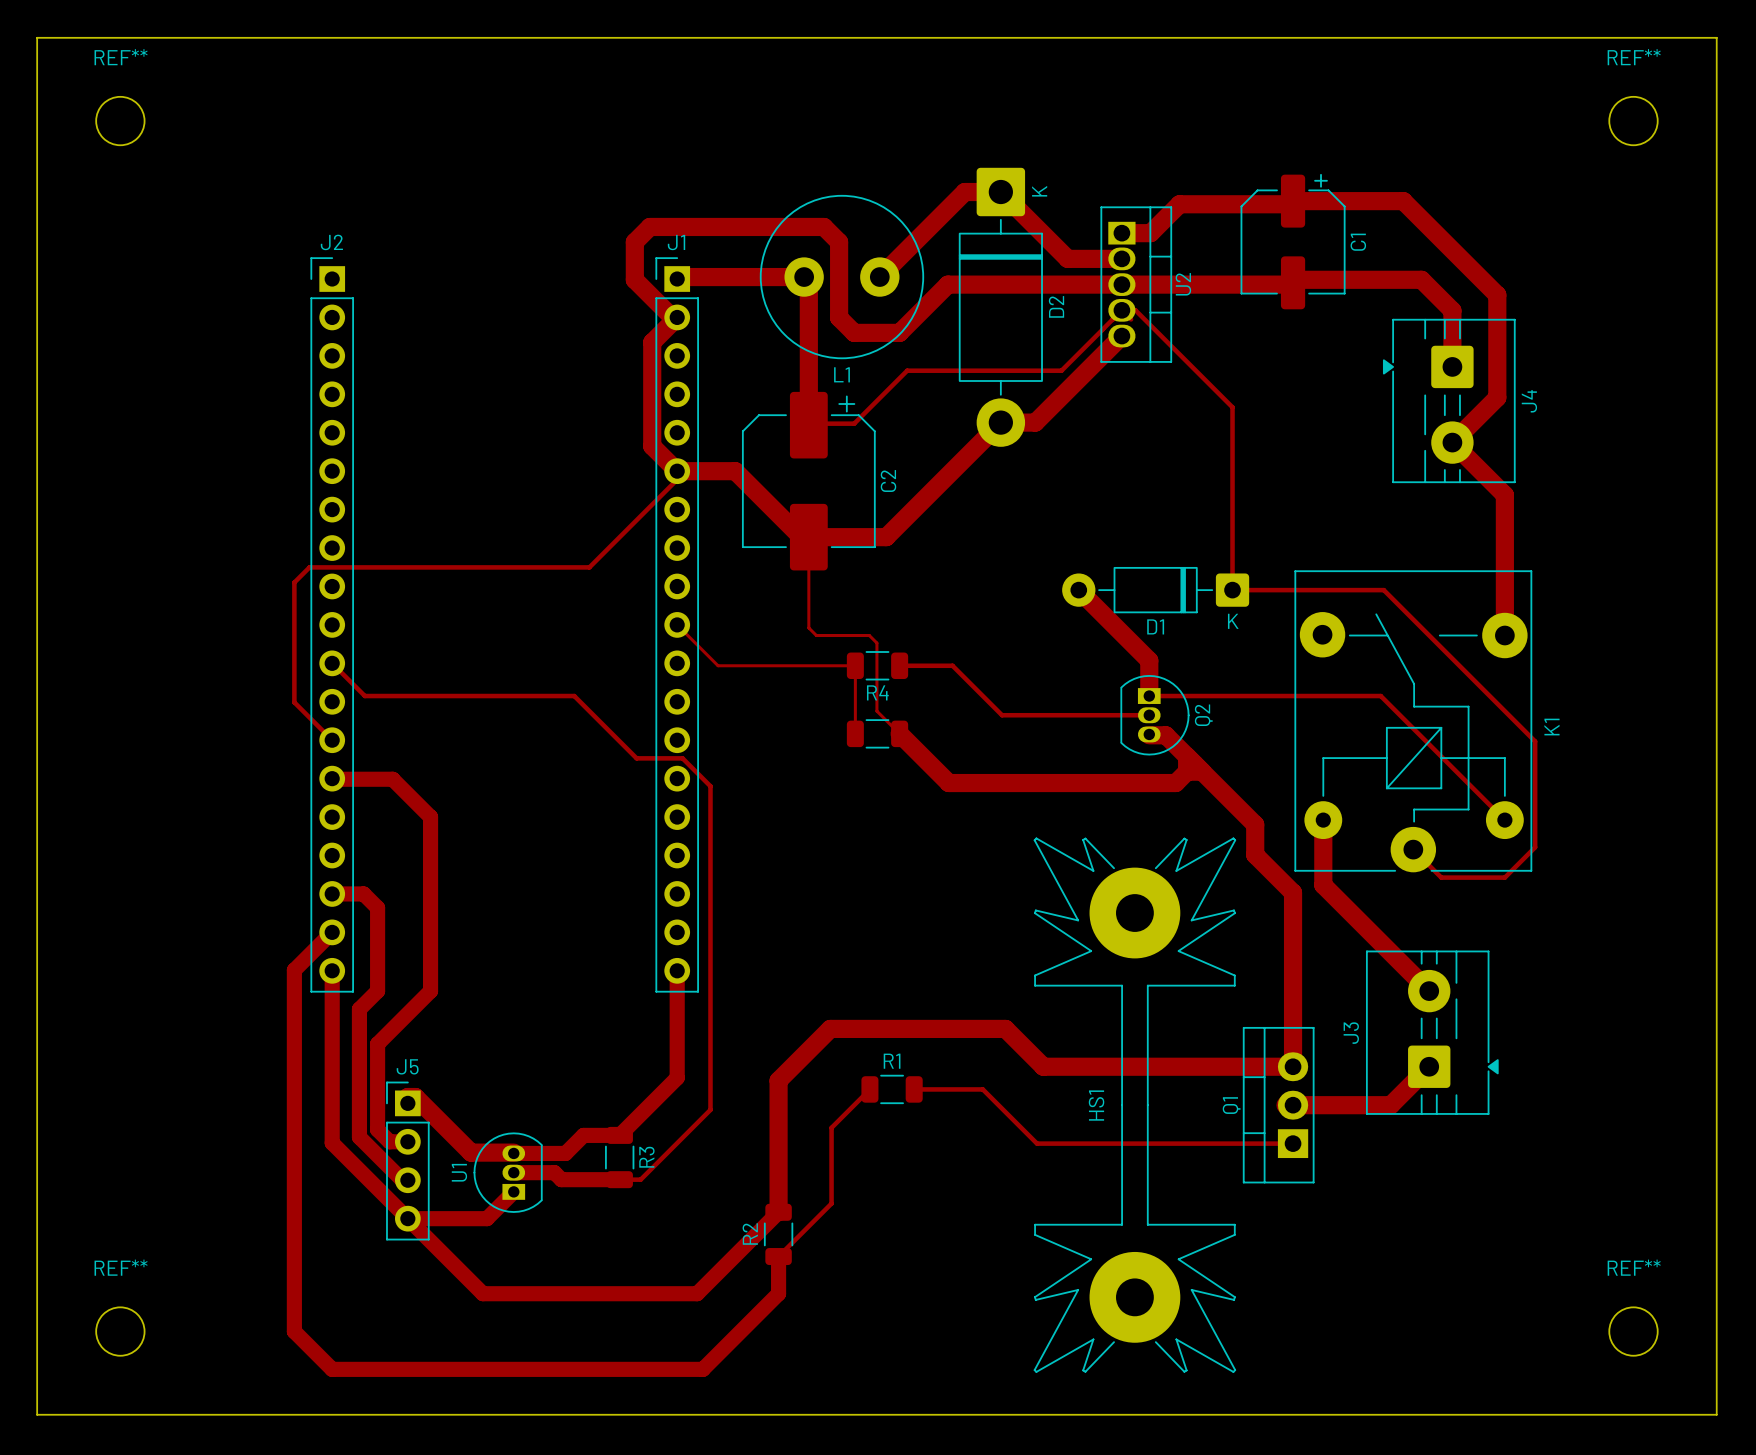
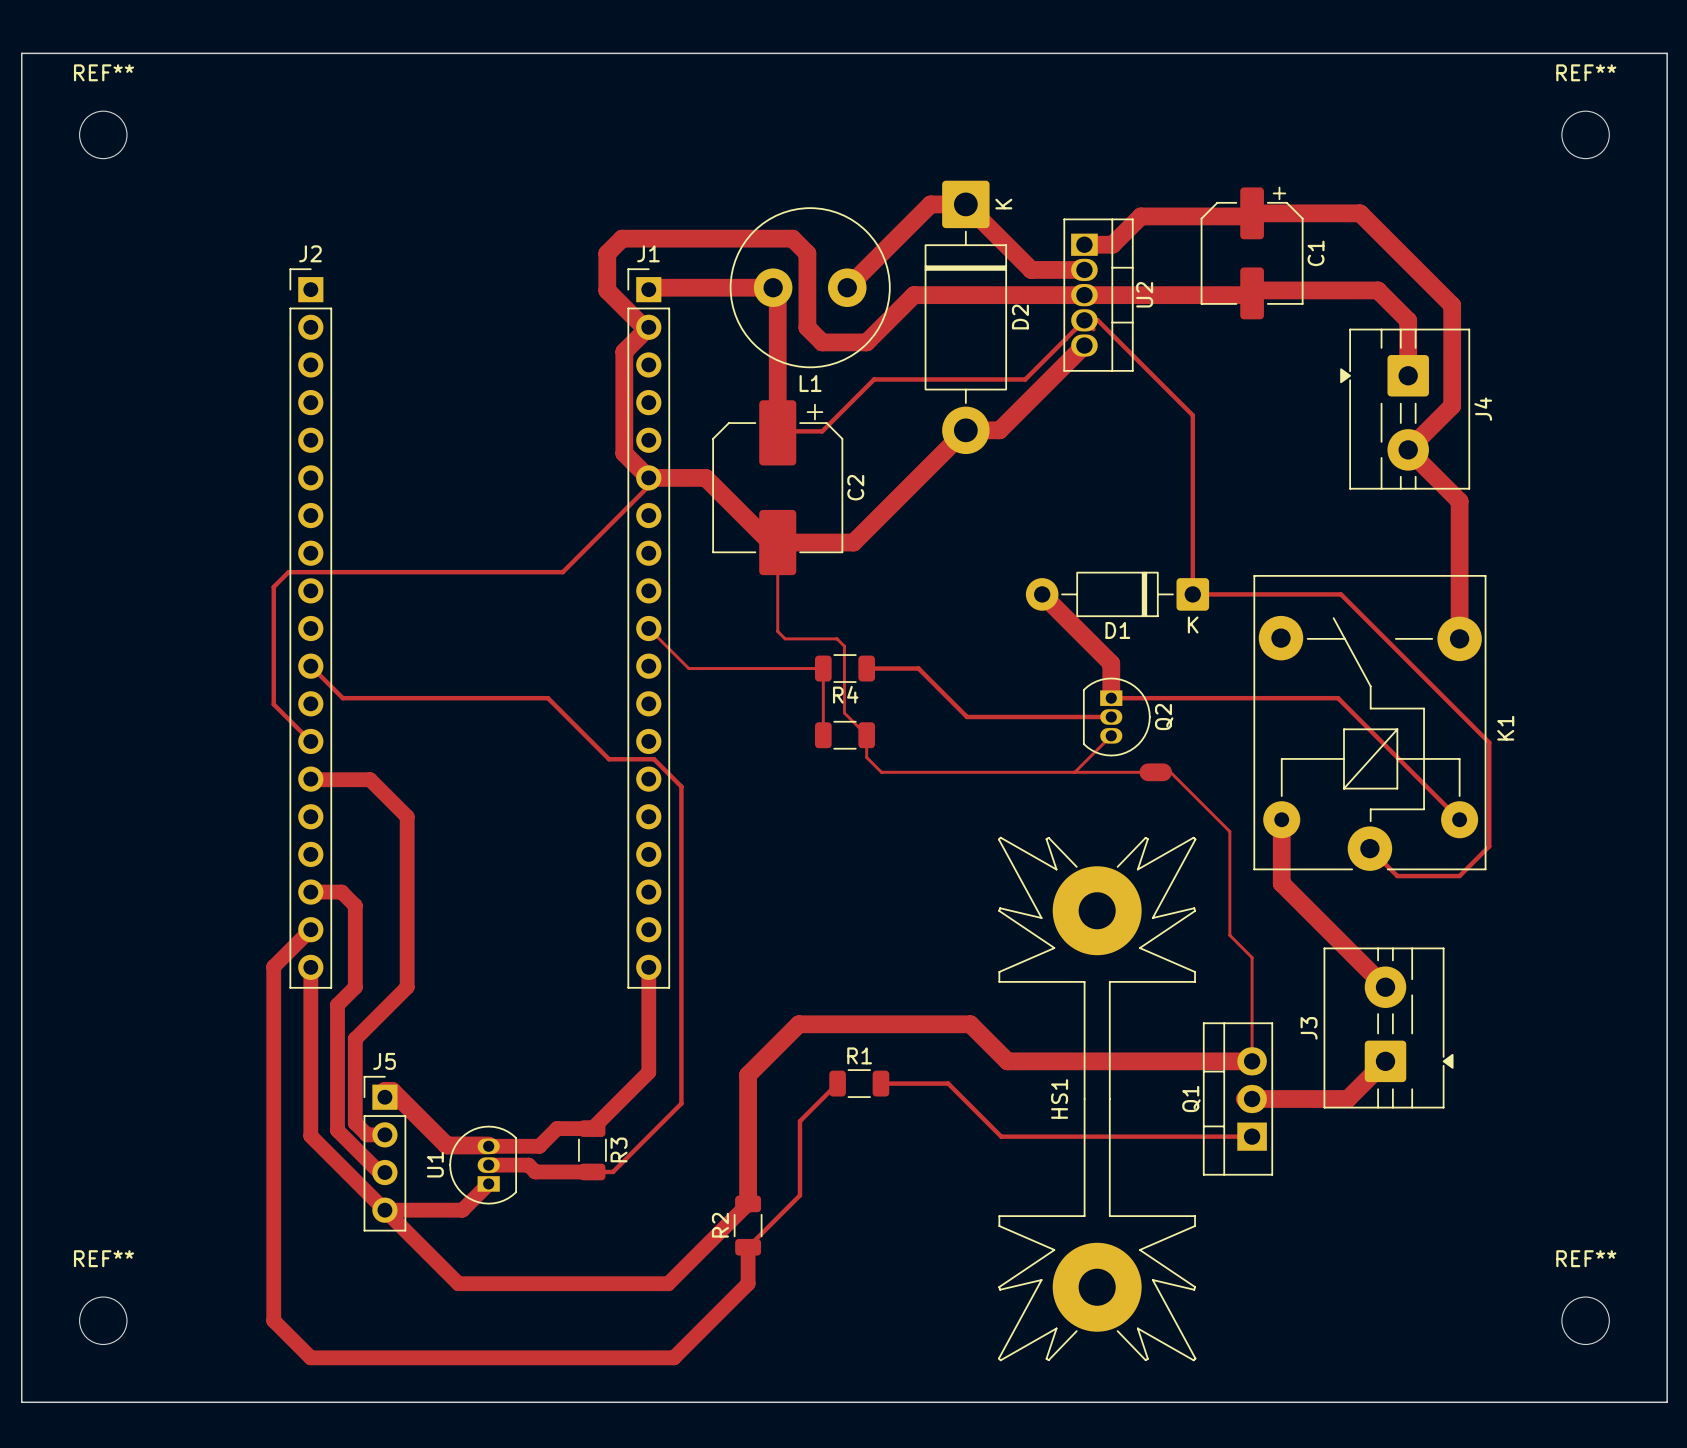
top track: (899, 733) (948, 783) (1175, 783) (1187, 771) (1187, 756) -> (866, 735) (866, 757) (881, 772) (1148, 772)
top track: none -> (1111, 735) (1074, 772)
top track: (1149, 735) (1165, 735) (1255, 824) (1255, 854) (1293, 892) (1293, 960) -> (1163, 772) (1170, 772) (1229, 831) (1229, 935) (1252, 957)
top track width: thick (1293, 960) (1293, 1066) -> thin (1252, 957) (1252, 1061)

